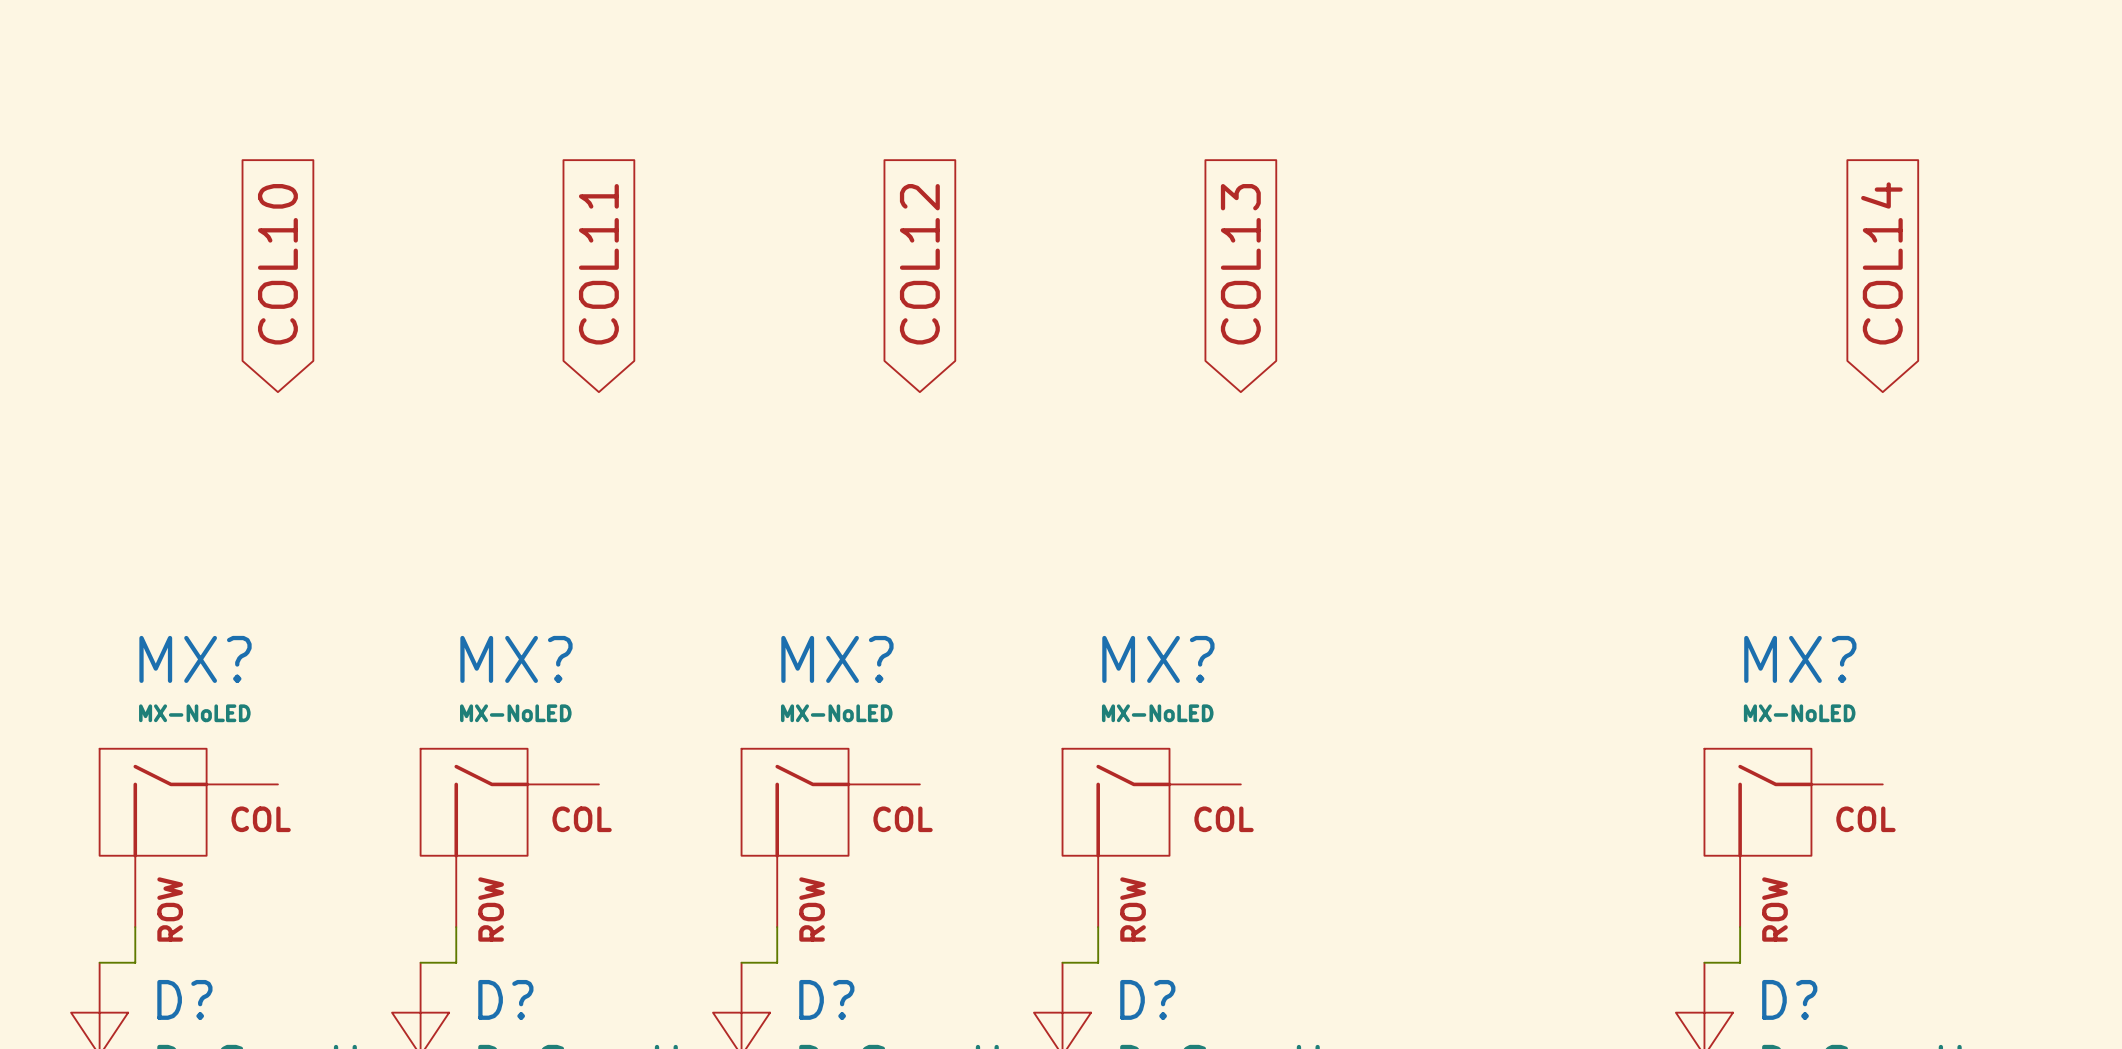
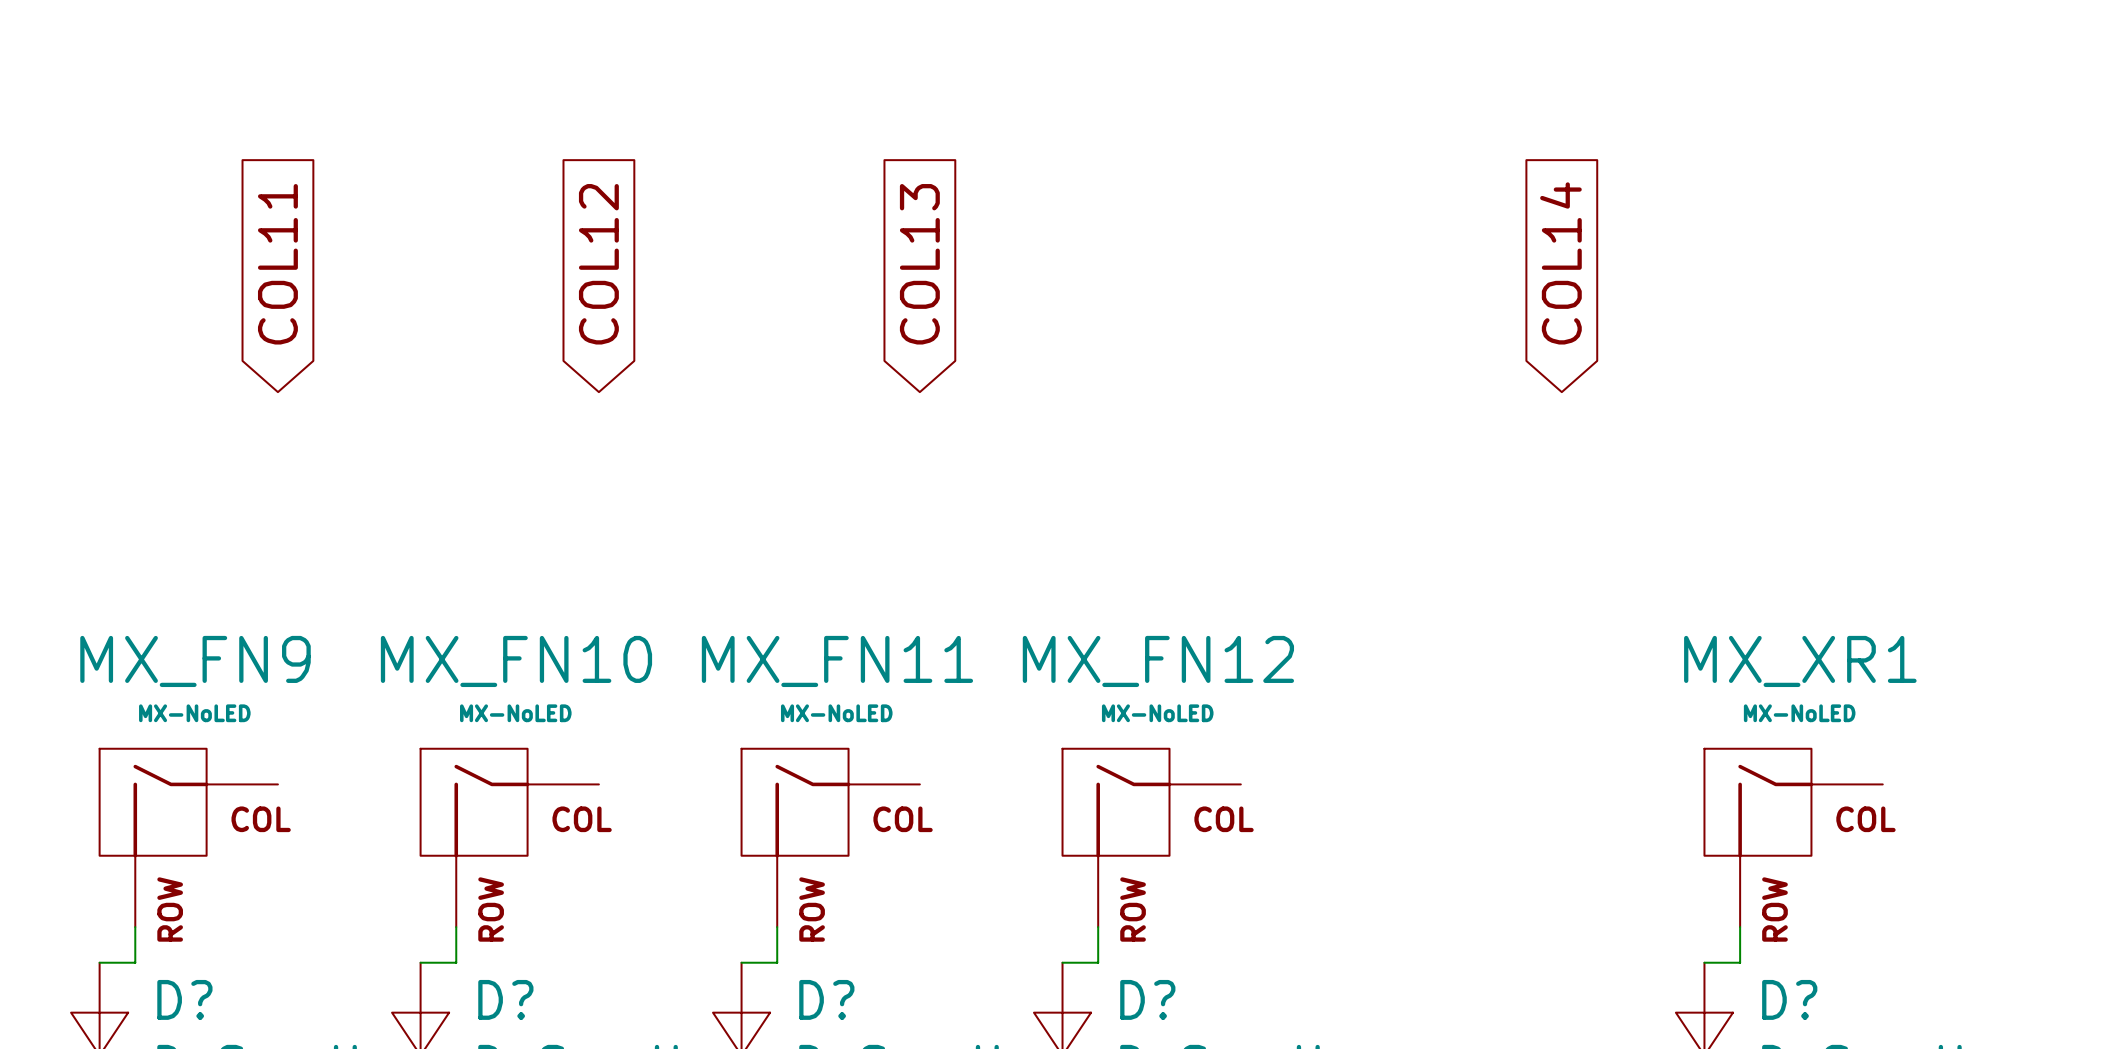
global label position: COL14 (1881, 263) -> COL14 (1560, 263)
global label: COL10 (277, 264) -> COL11 (277, 264)
global label: COL11 (598, 264) -> COL12 (598, 264)
global label: COL12 (919, 264) -> COL13 (919, 264)
global label: COL13 (1240, 264) -> none
MX? name: MX? (195, 659) -> MX_FN9 (195, 661)
MX? name: MX? (516, 659) -> MX_FN10 (516, 661)
MX? name: MX? (837, 659) -> MX_FN11 (837, 661)
MX? name: MX? (1158, 659) -> MX_FN12 (1158, 661)
MX? name: MX? (1800, 659) -> MX_XR1 (1800, 661)

